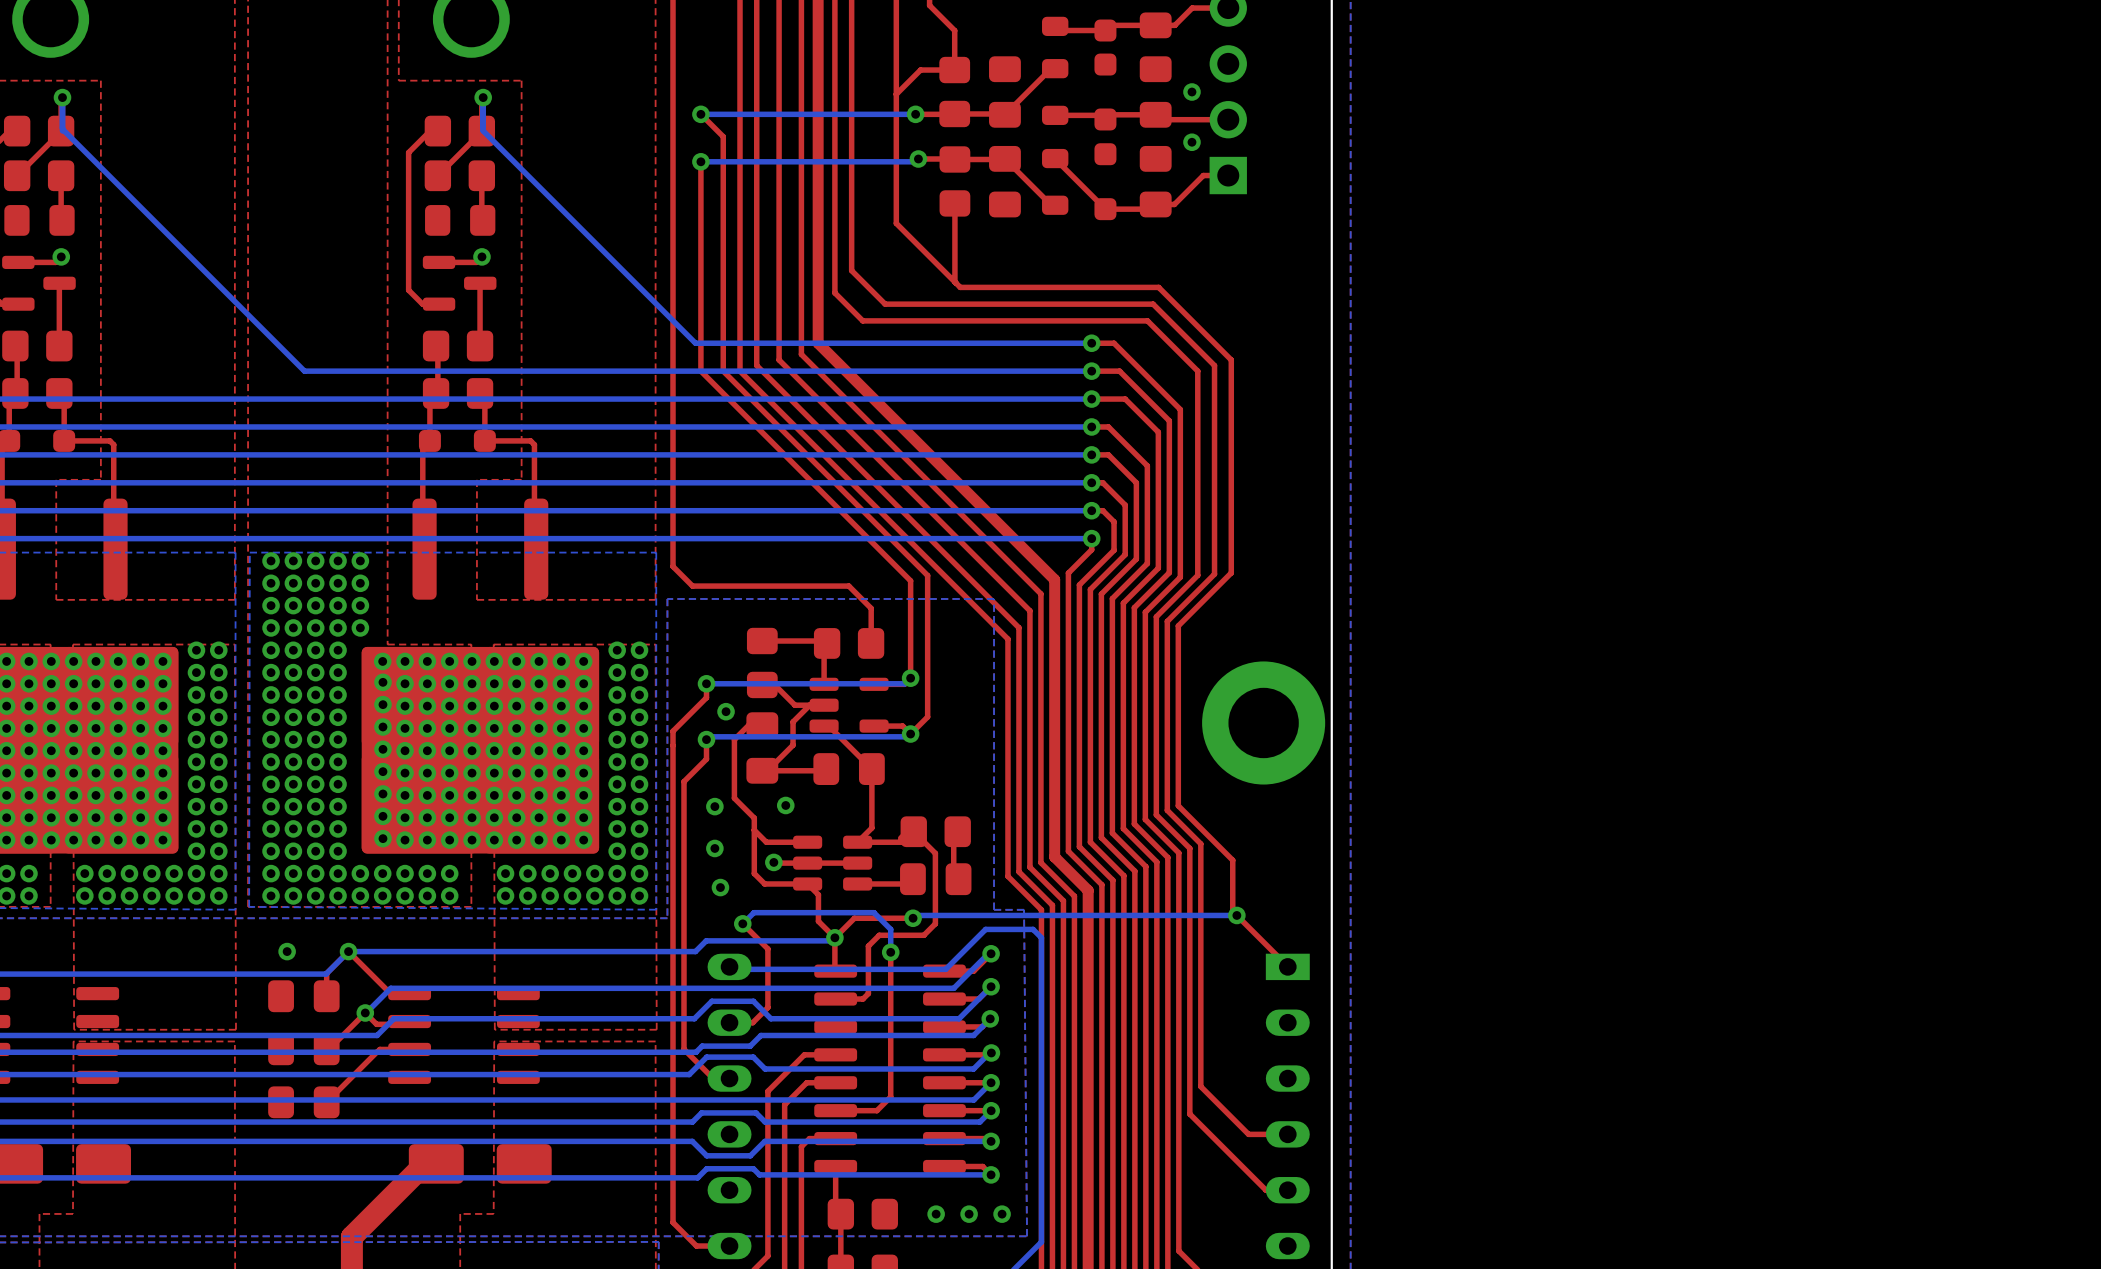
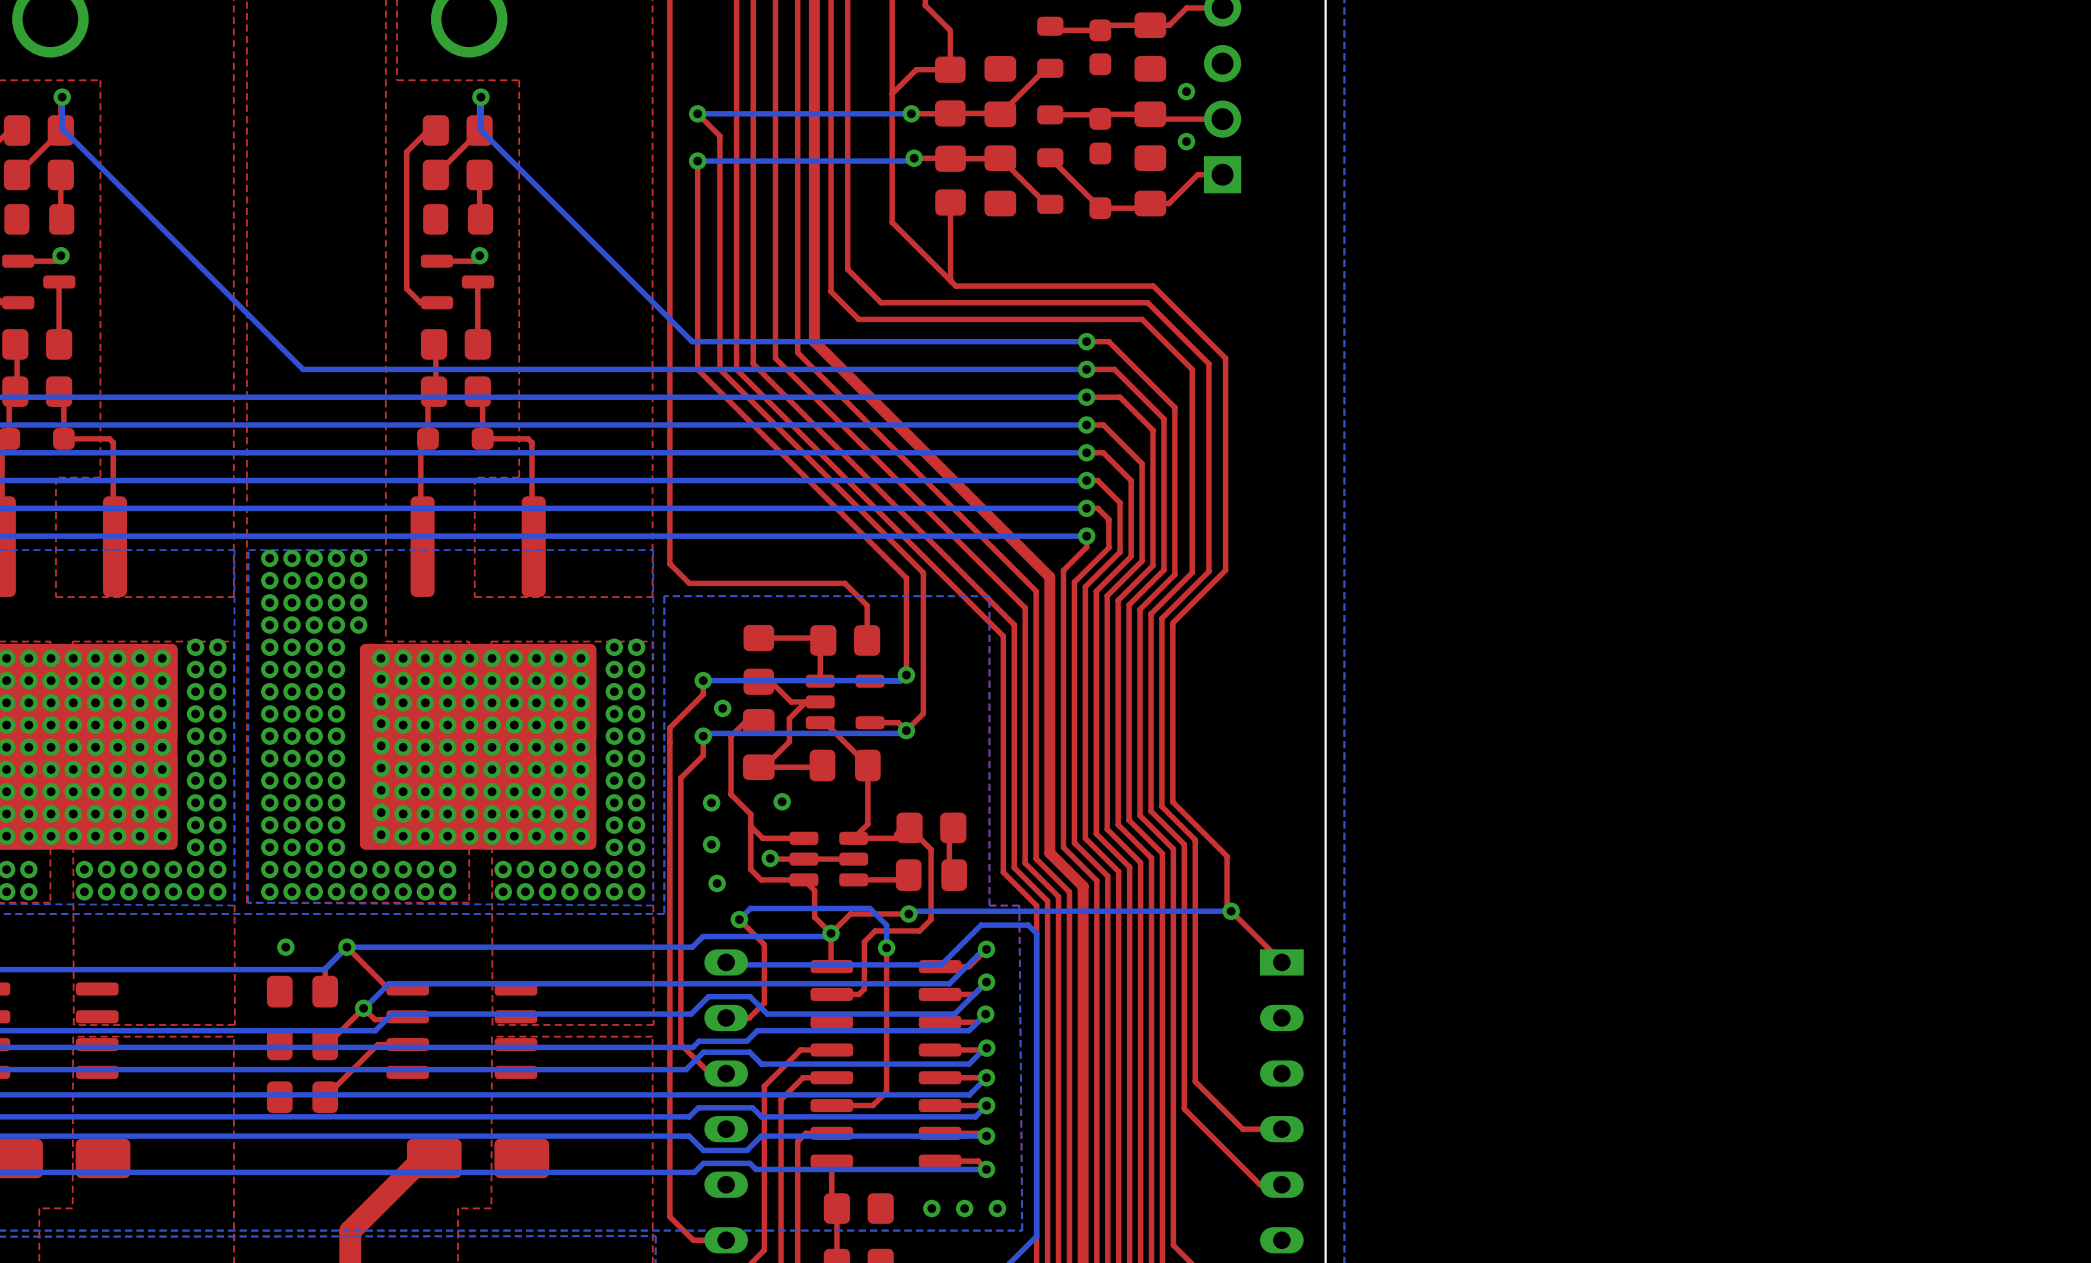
part: (1263, 722) -> none

